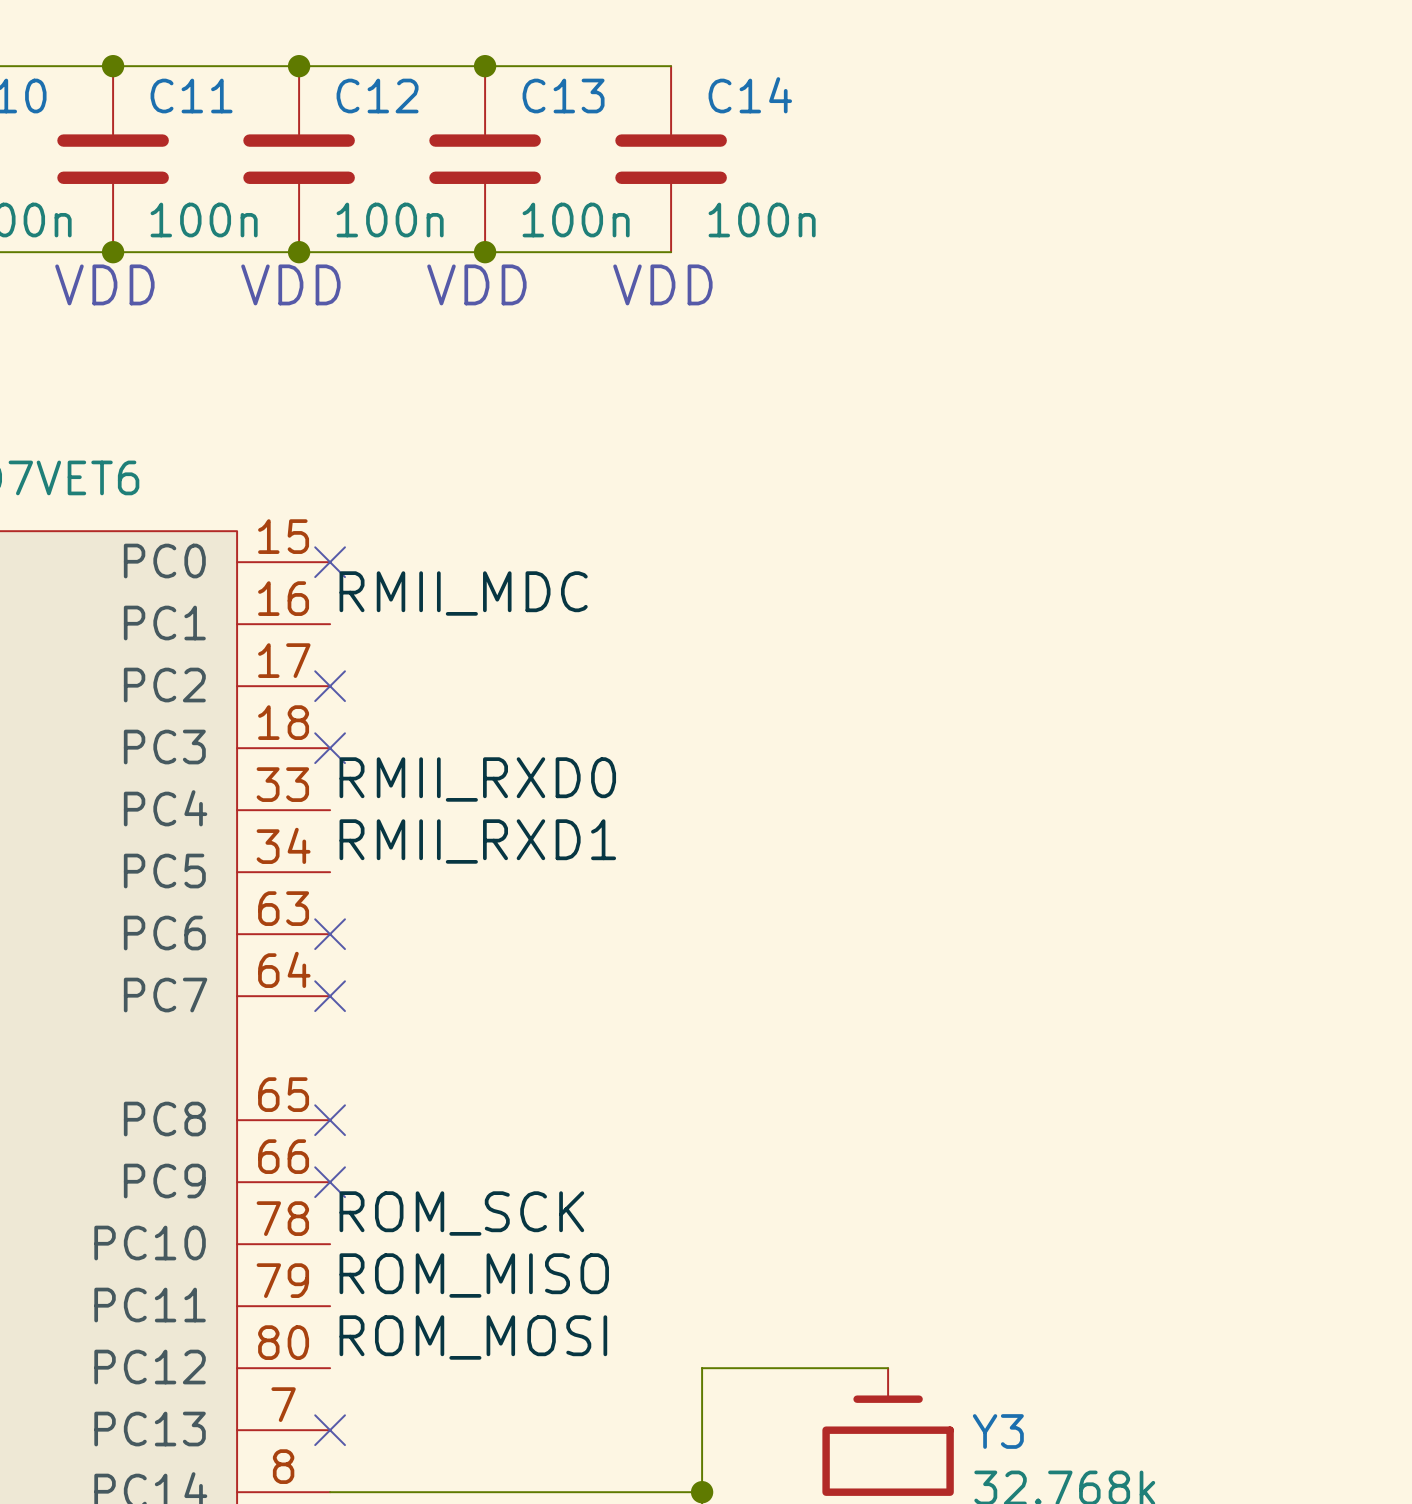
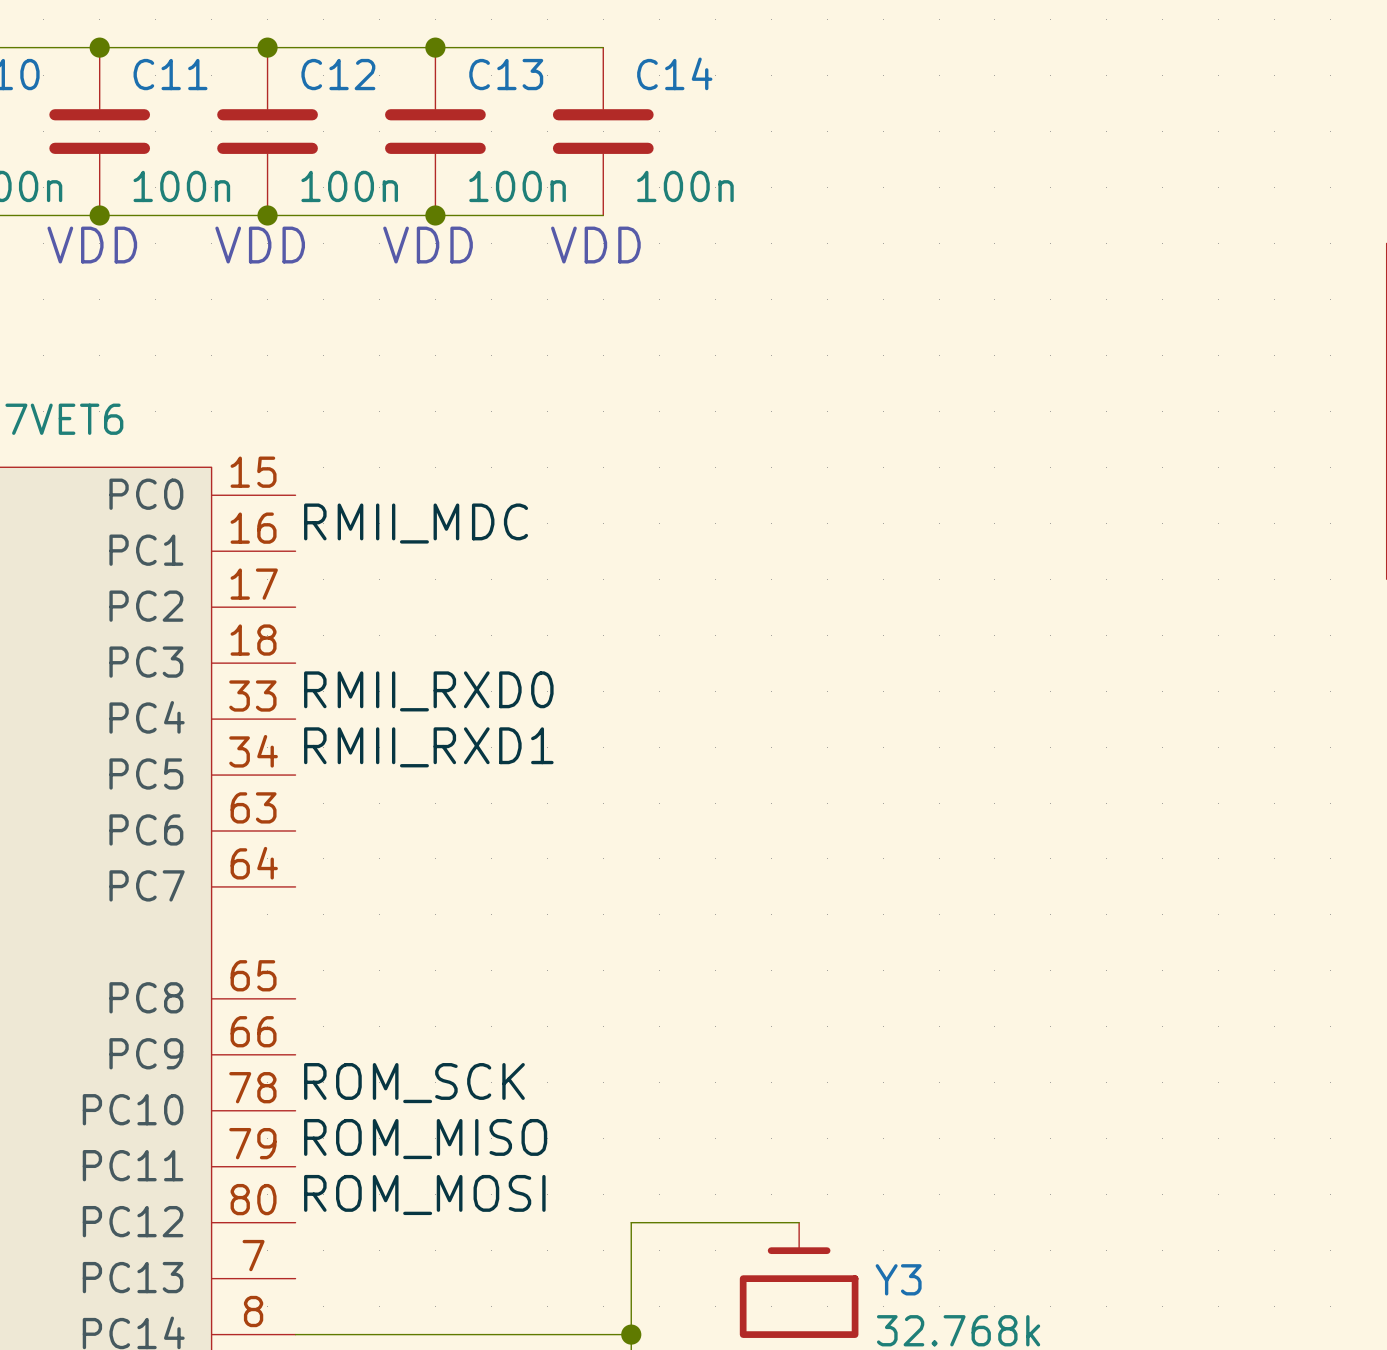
no-connect mark: (330, 562) -> none
no-connect mark: (330, 686) -> none
no-connect mark: (330, 748) -> none
no-connect mark: (330, 934) -> none
no-connect mark: (330, 996) -> none
no-connect mark: (330, 1120) -> none
no-connect mark: (330, 1182) -> none
no-connect mark: (330, 1430) -> none

